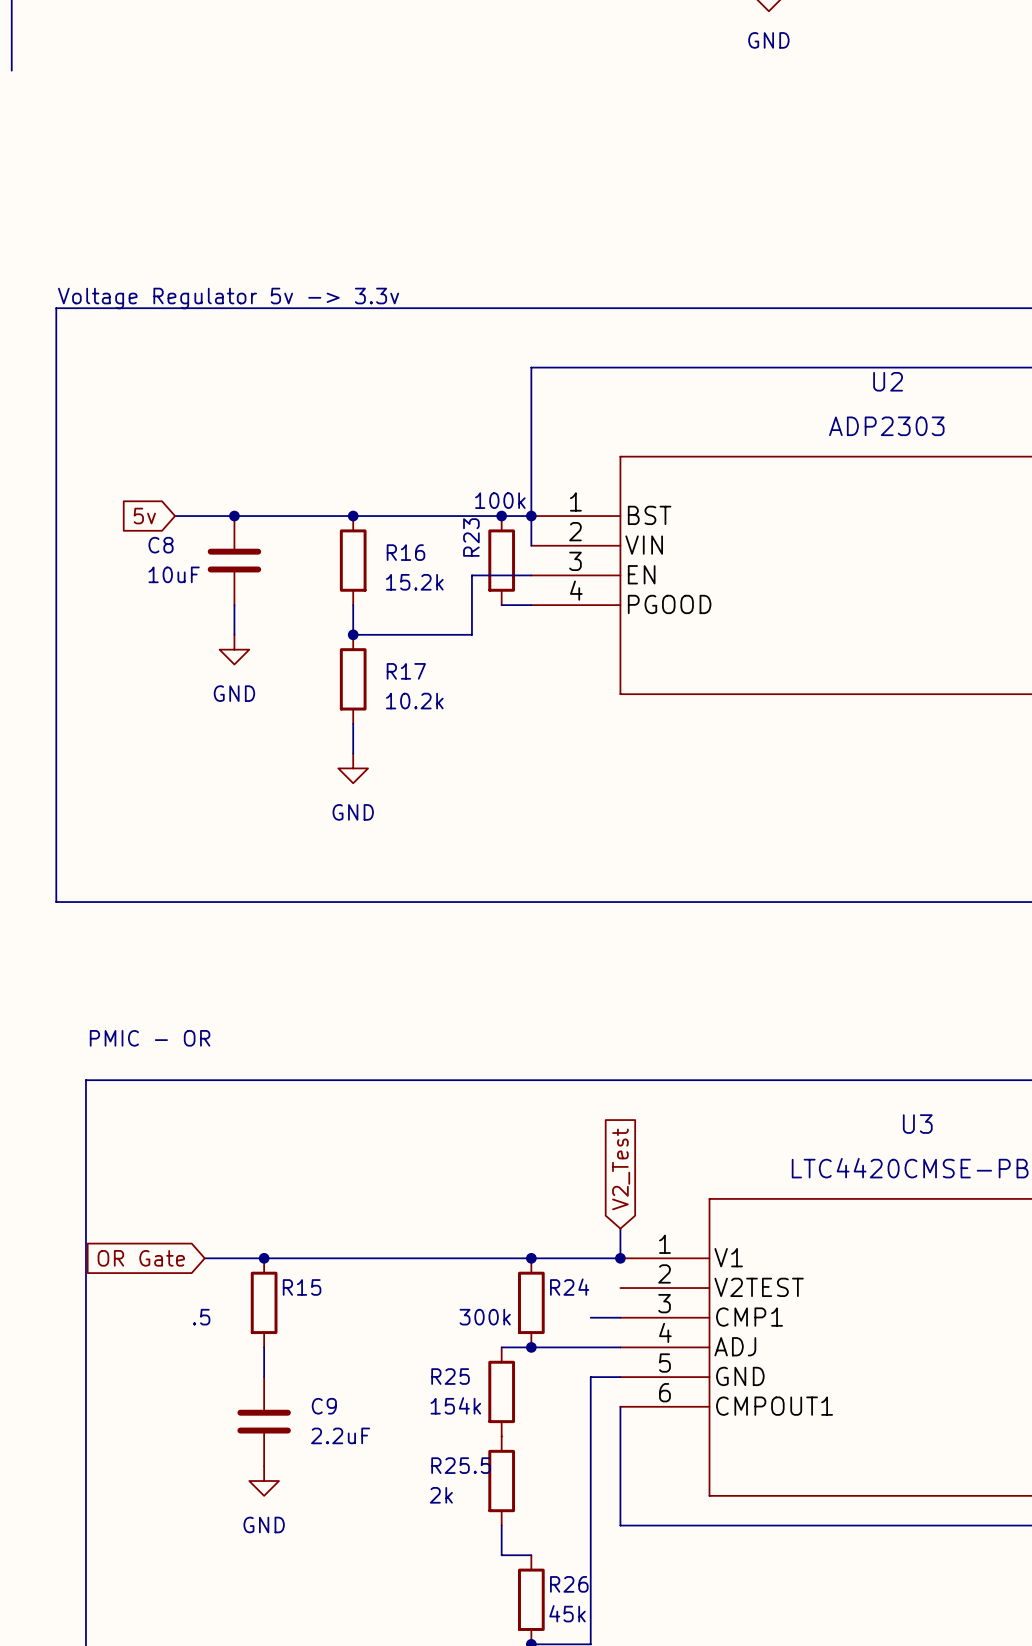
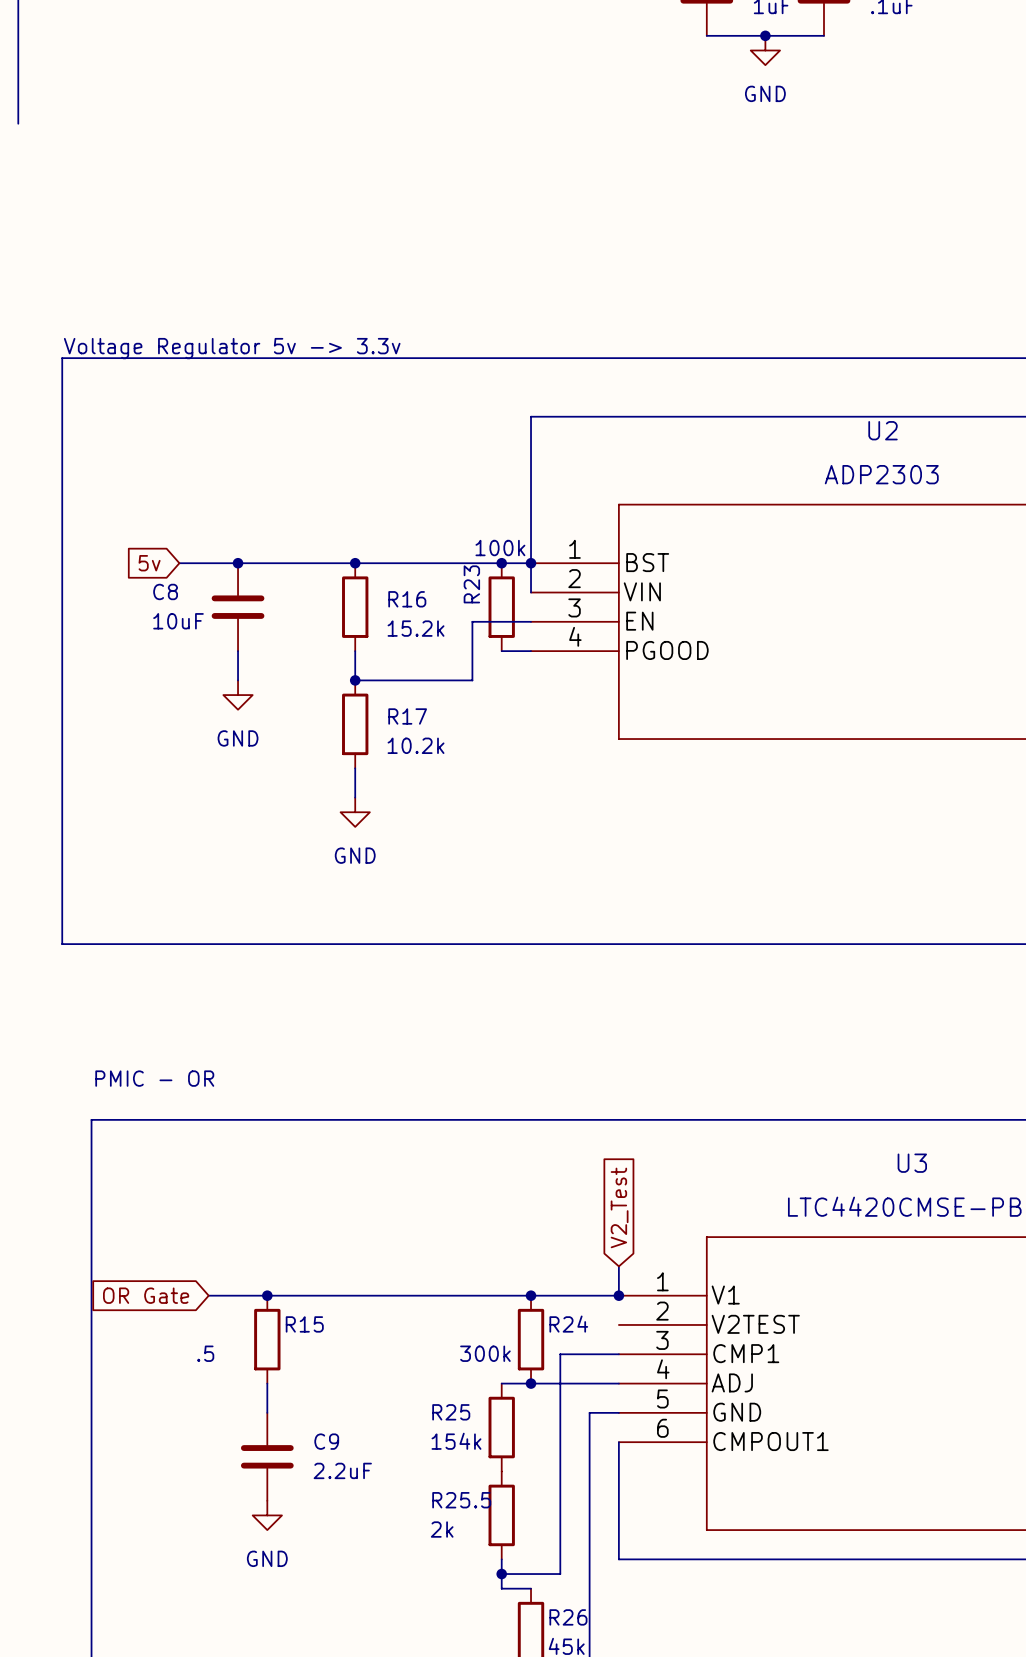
wire: none -> (589, 1354) (560, 1354) (560, 1574) (501, 1574)
junction: none -> (501, 1574)

